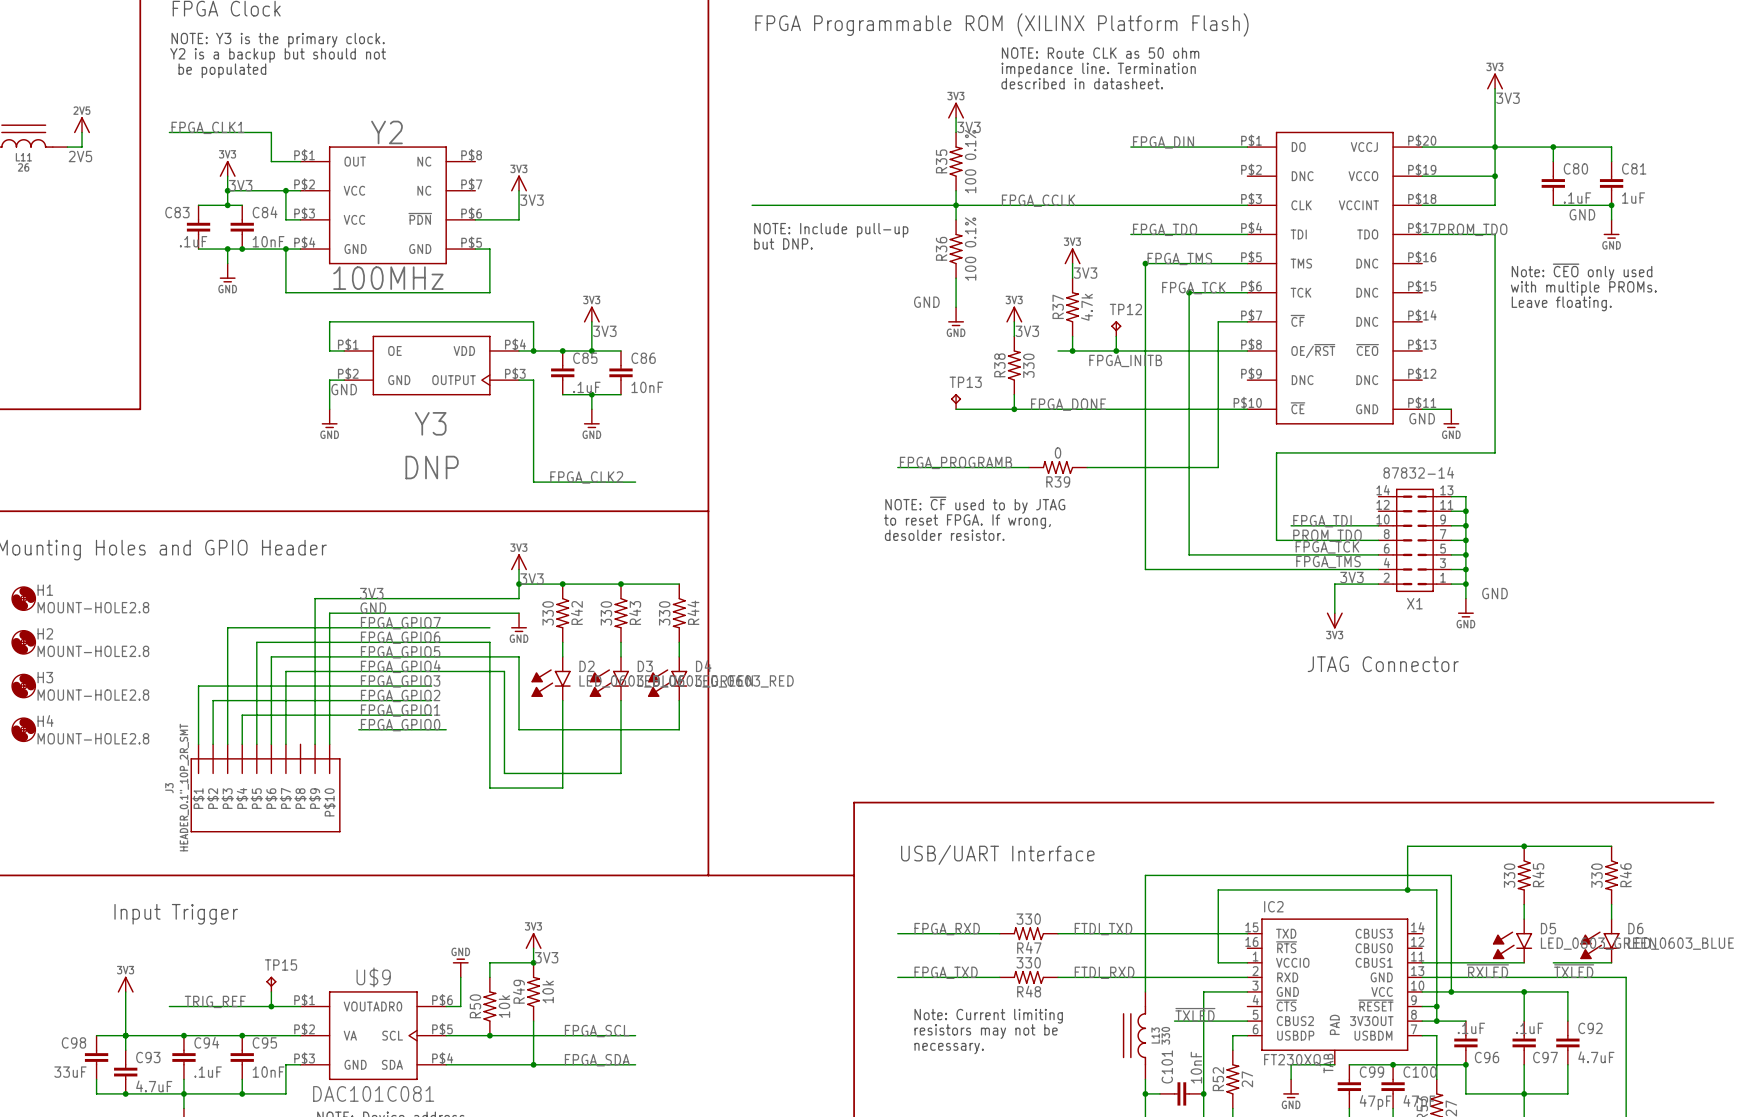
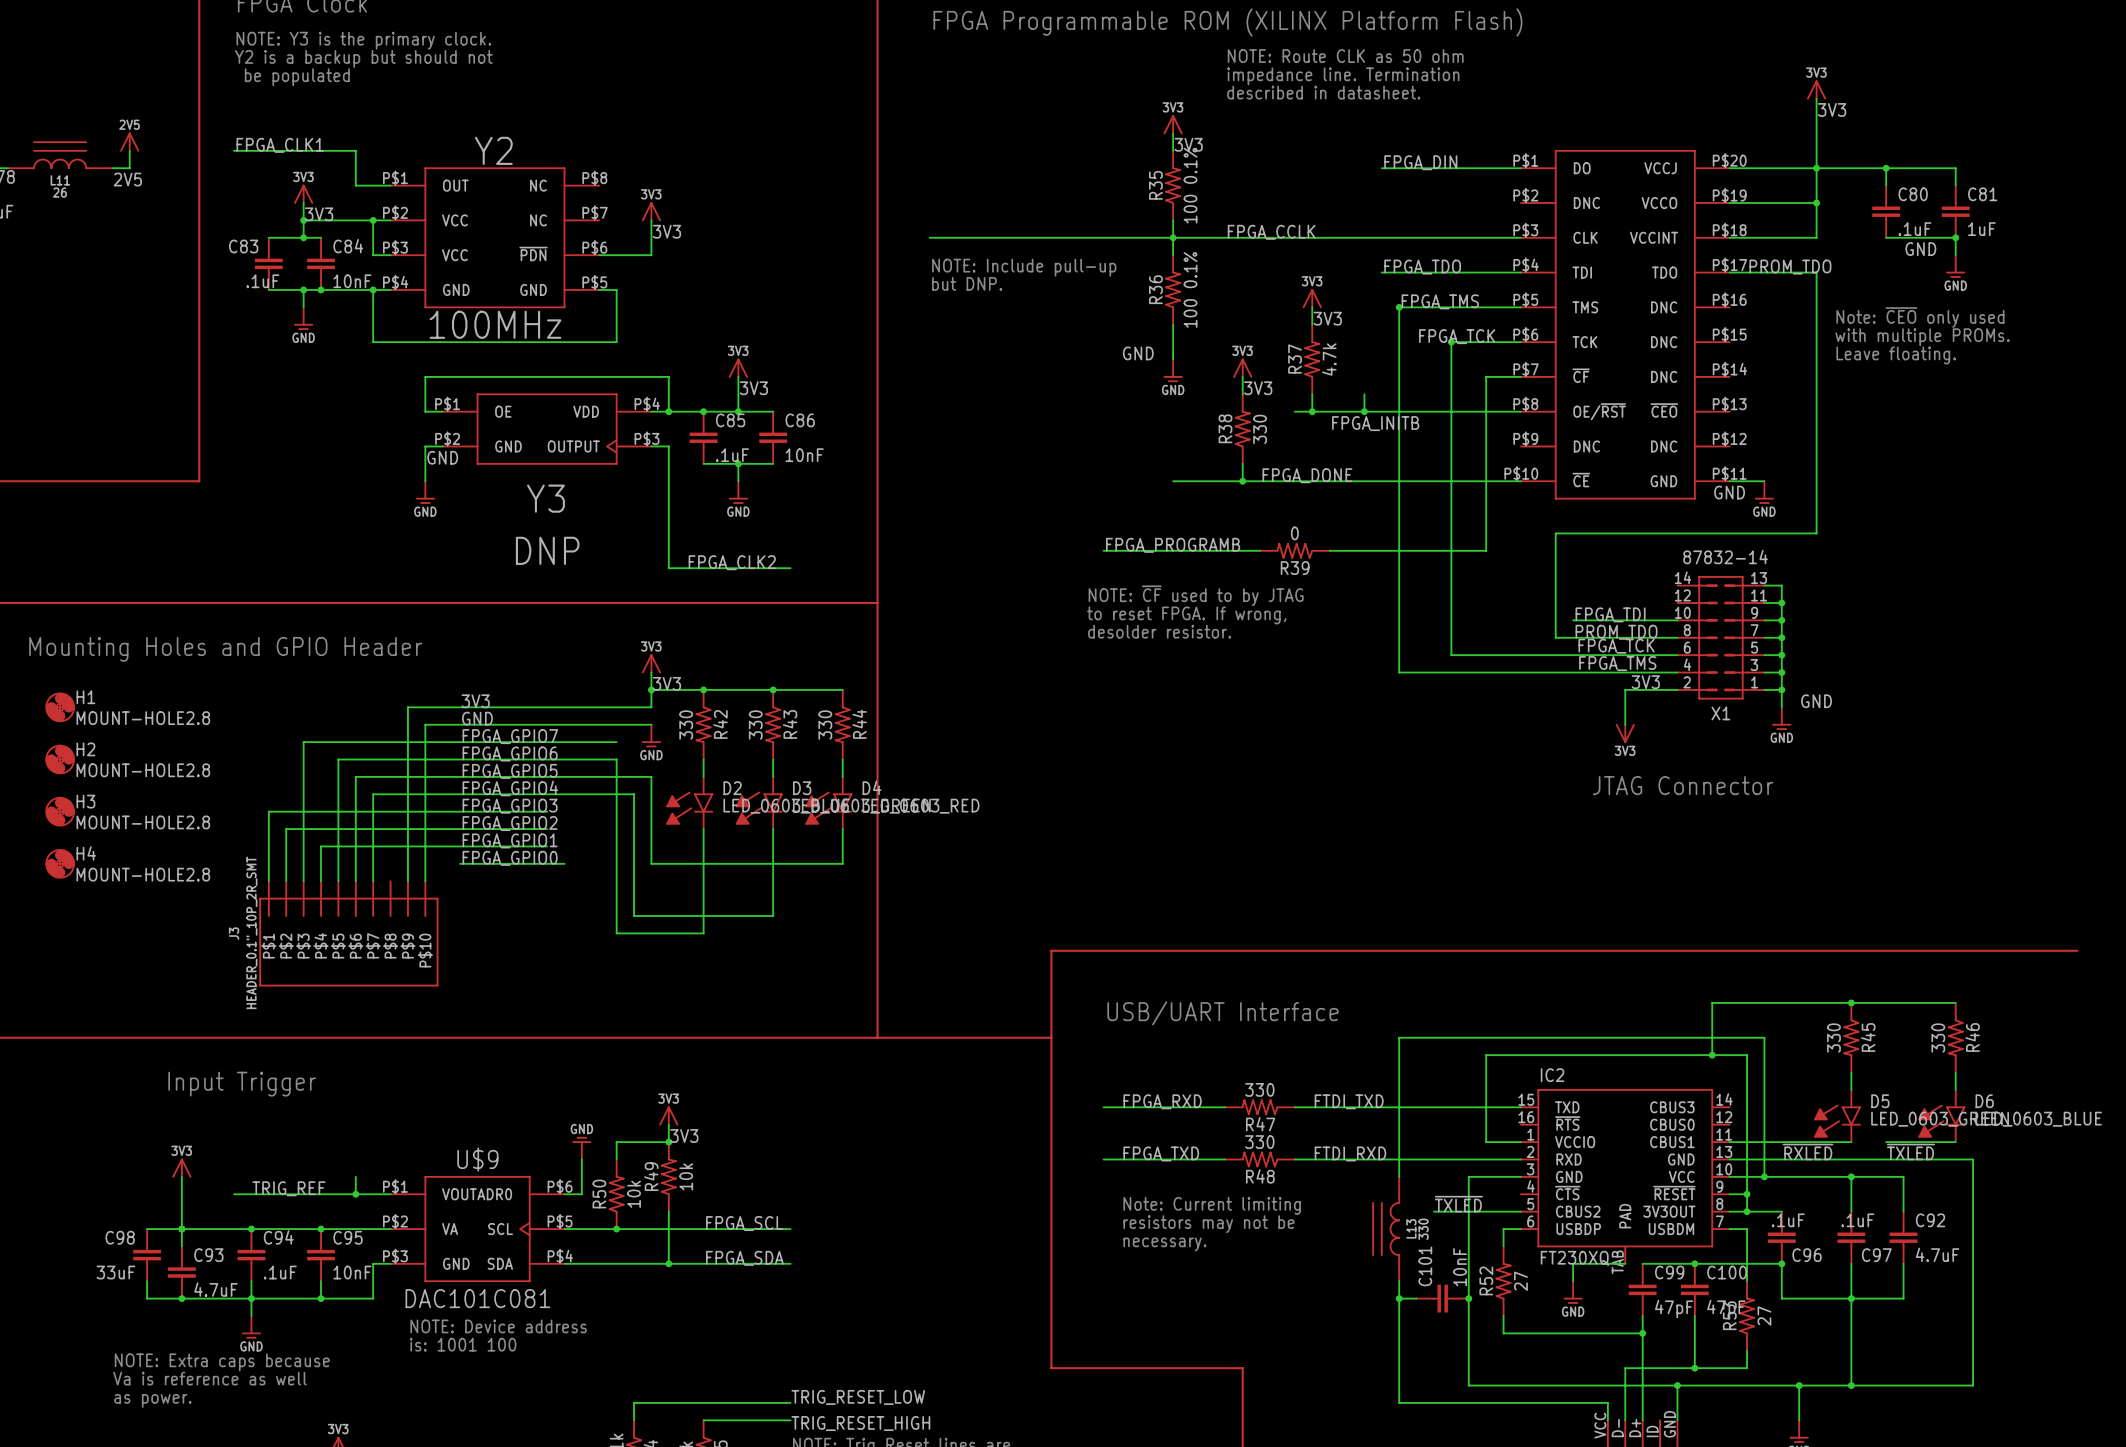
TP12: (1116, 328) -> none
TP13: (956, 401) -> none
TP15: (271, 984) -> none

